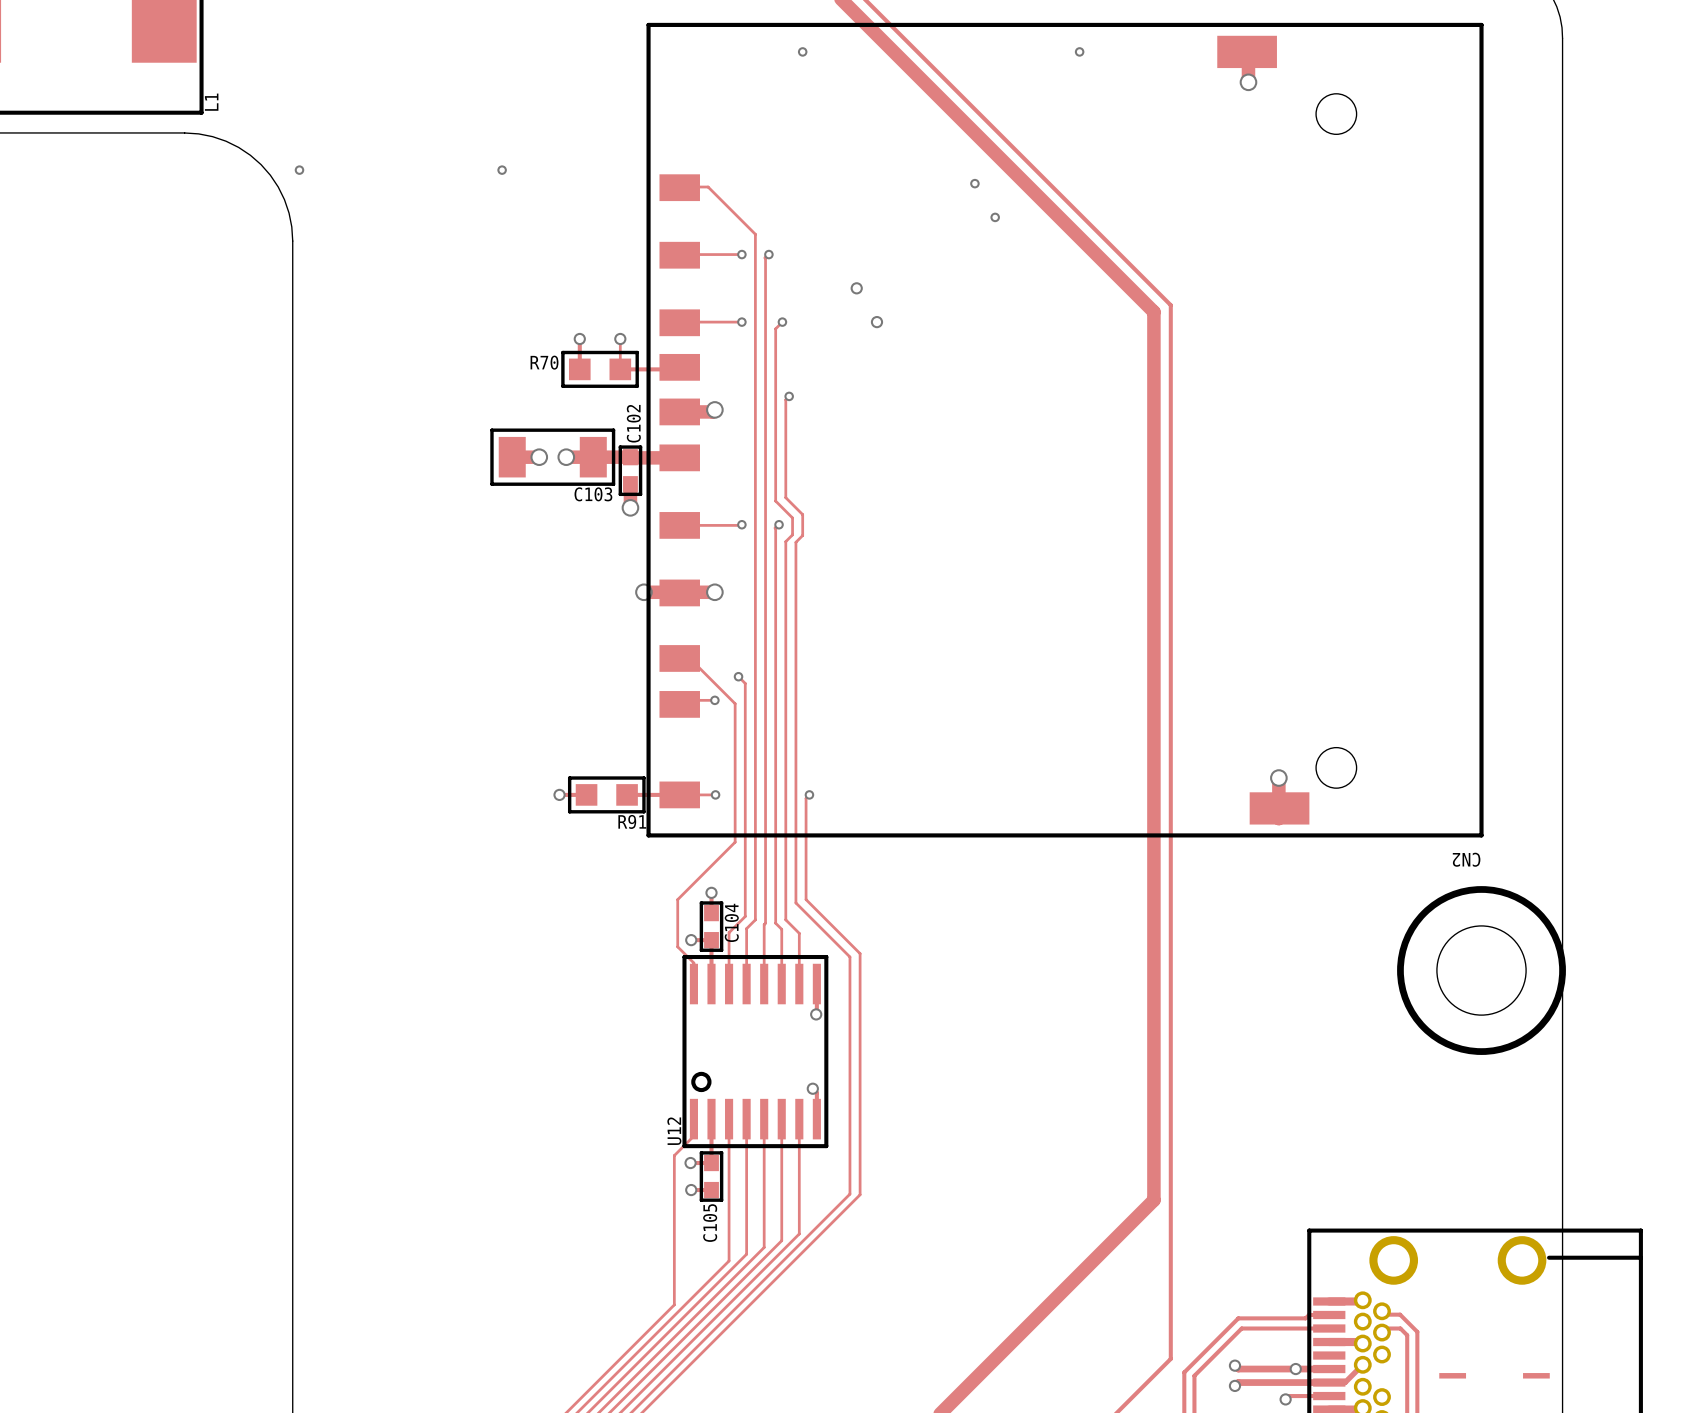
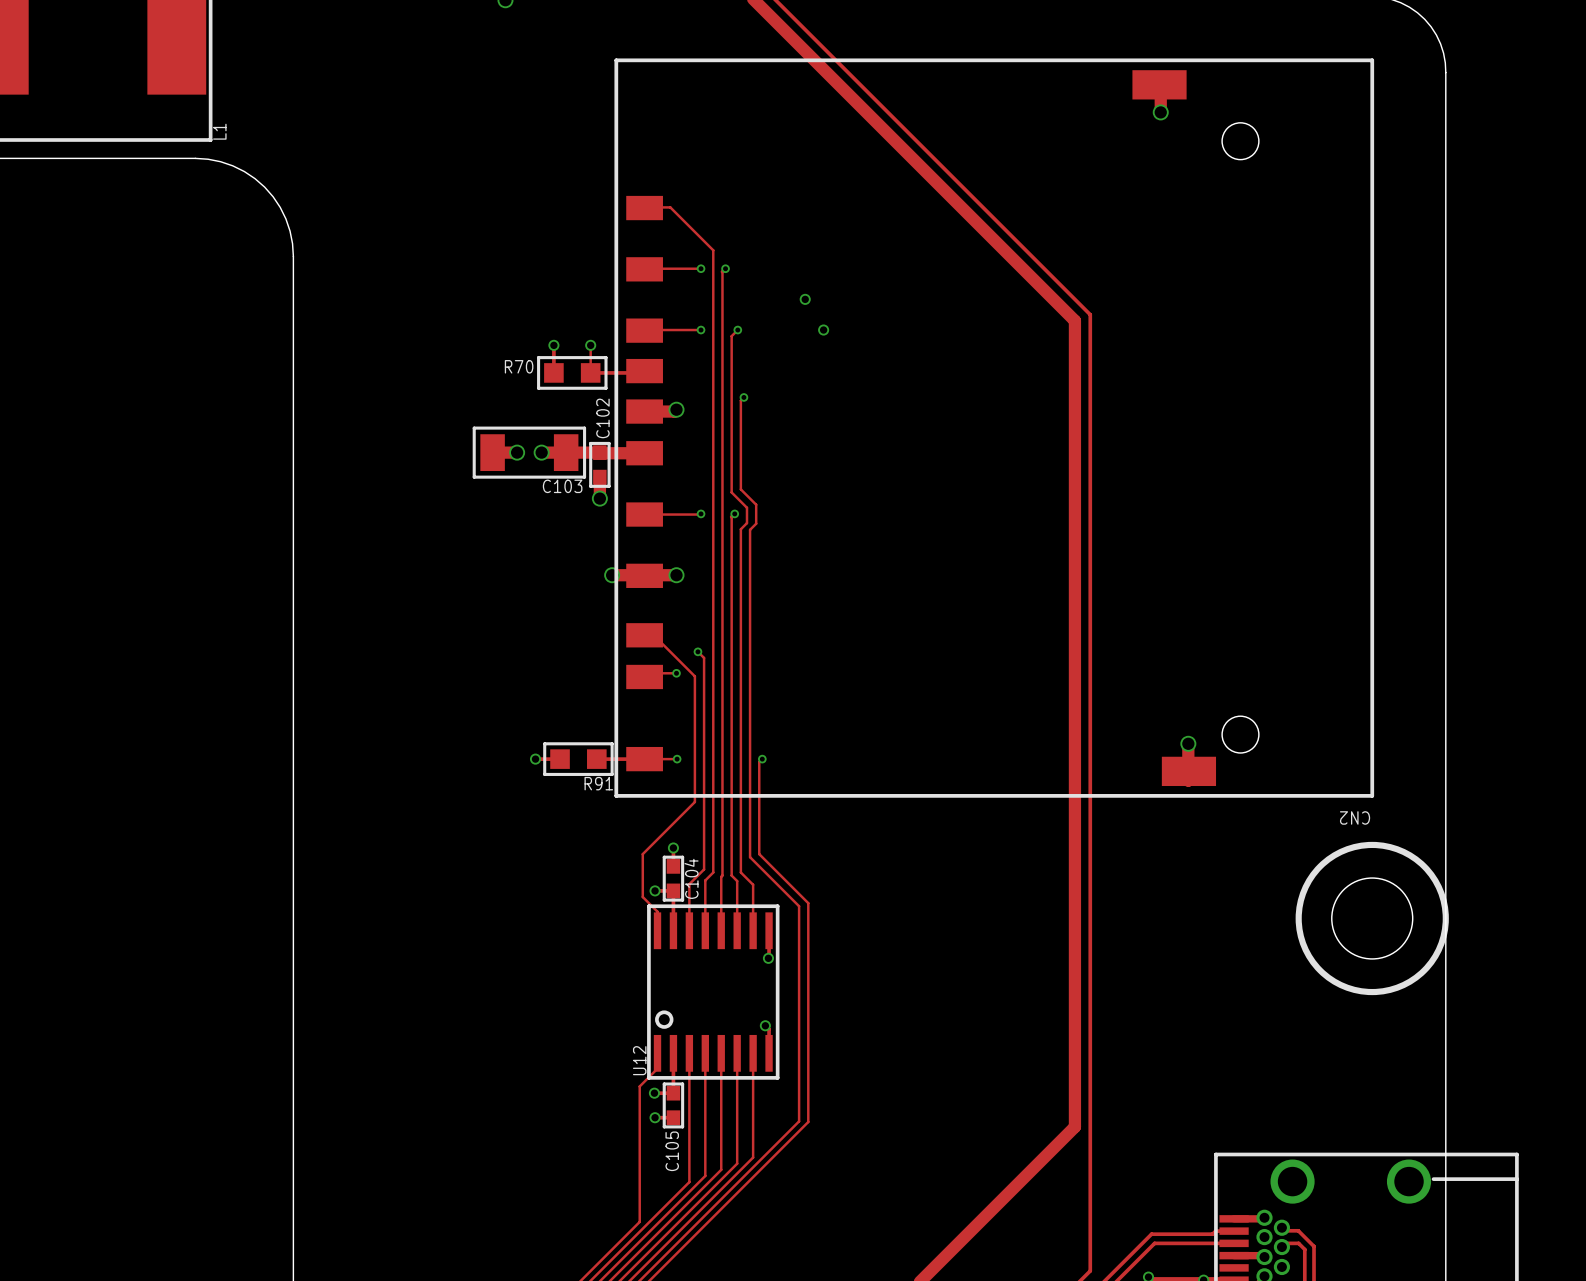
via: (802, 51) -> none
via: (1079, 51) -> none
via: (299, 170) -> none
via: (502, 170) -> none
via: (974, 183) -> none
via: (995, 217) -> none

